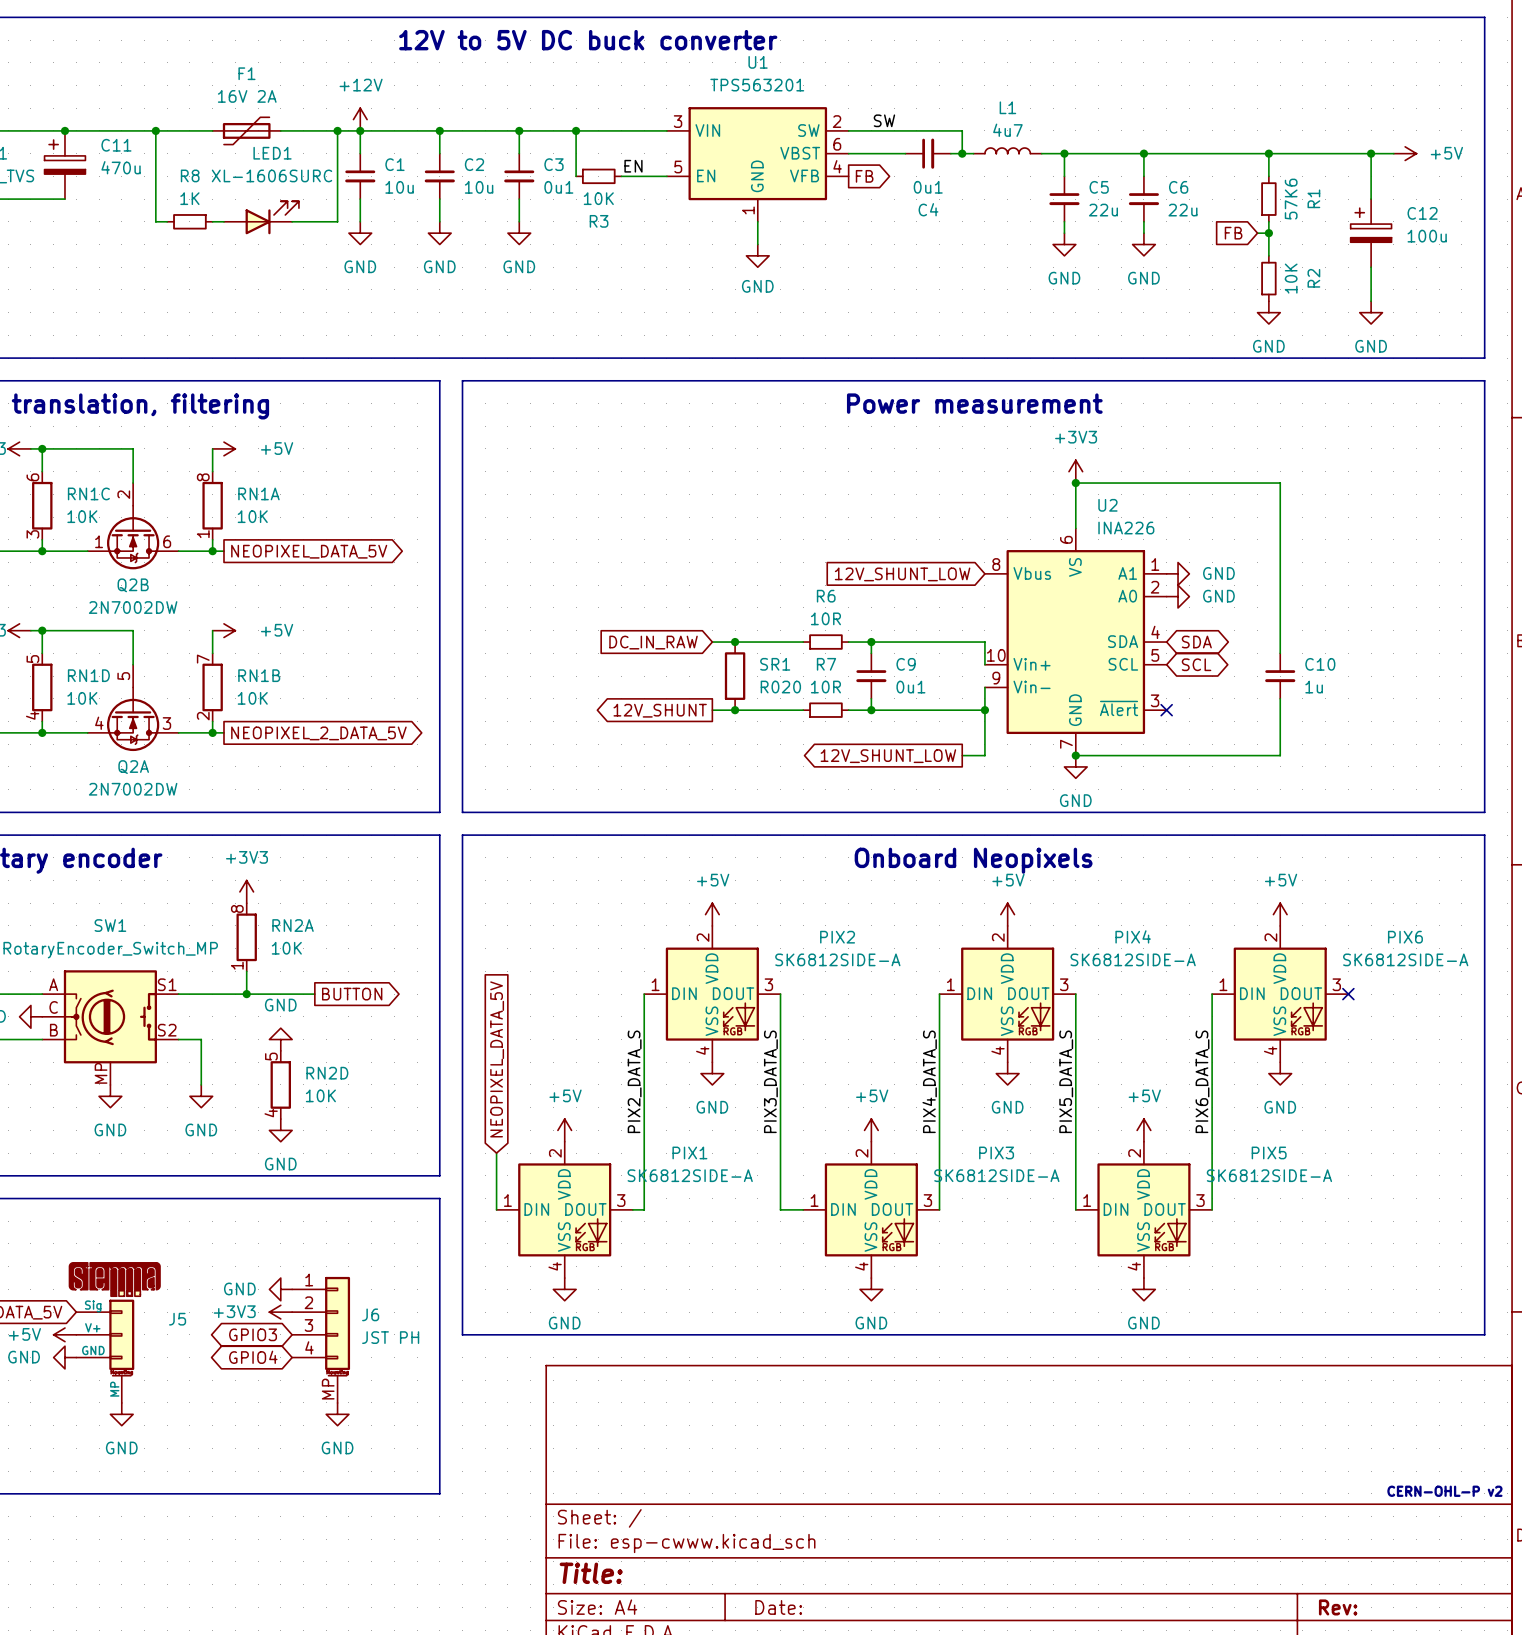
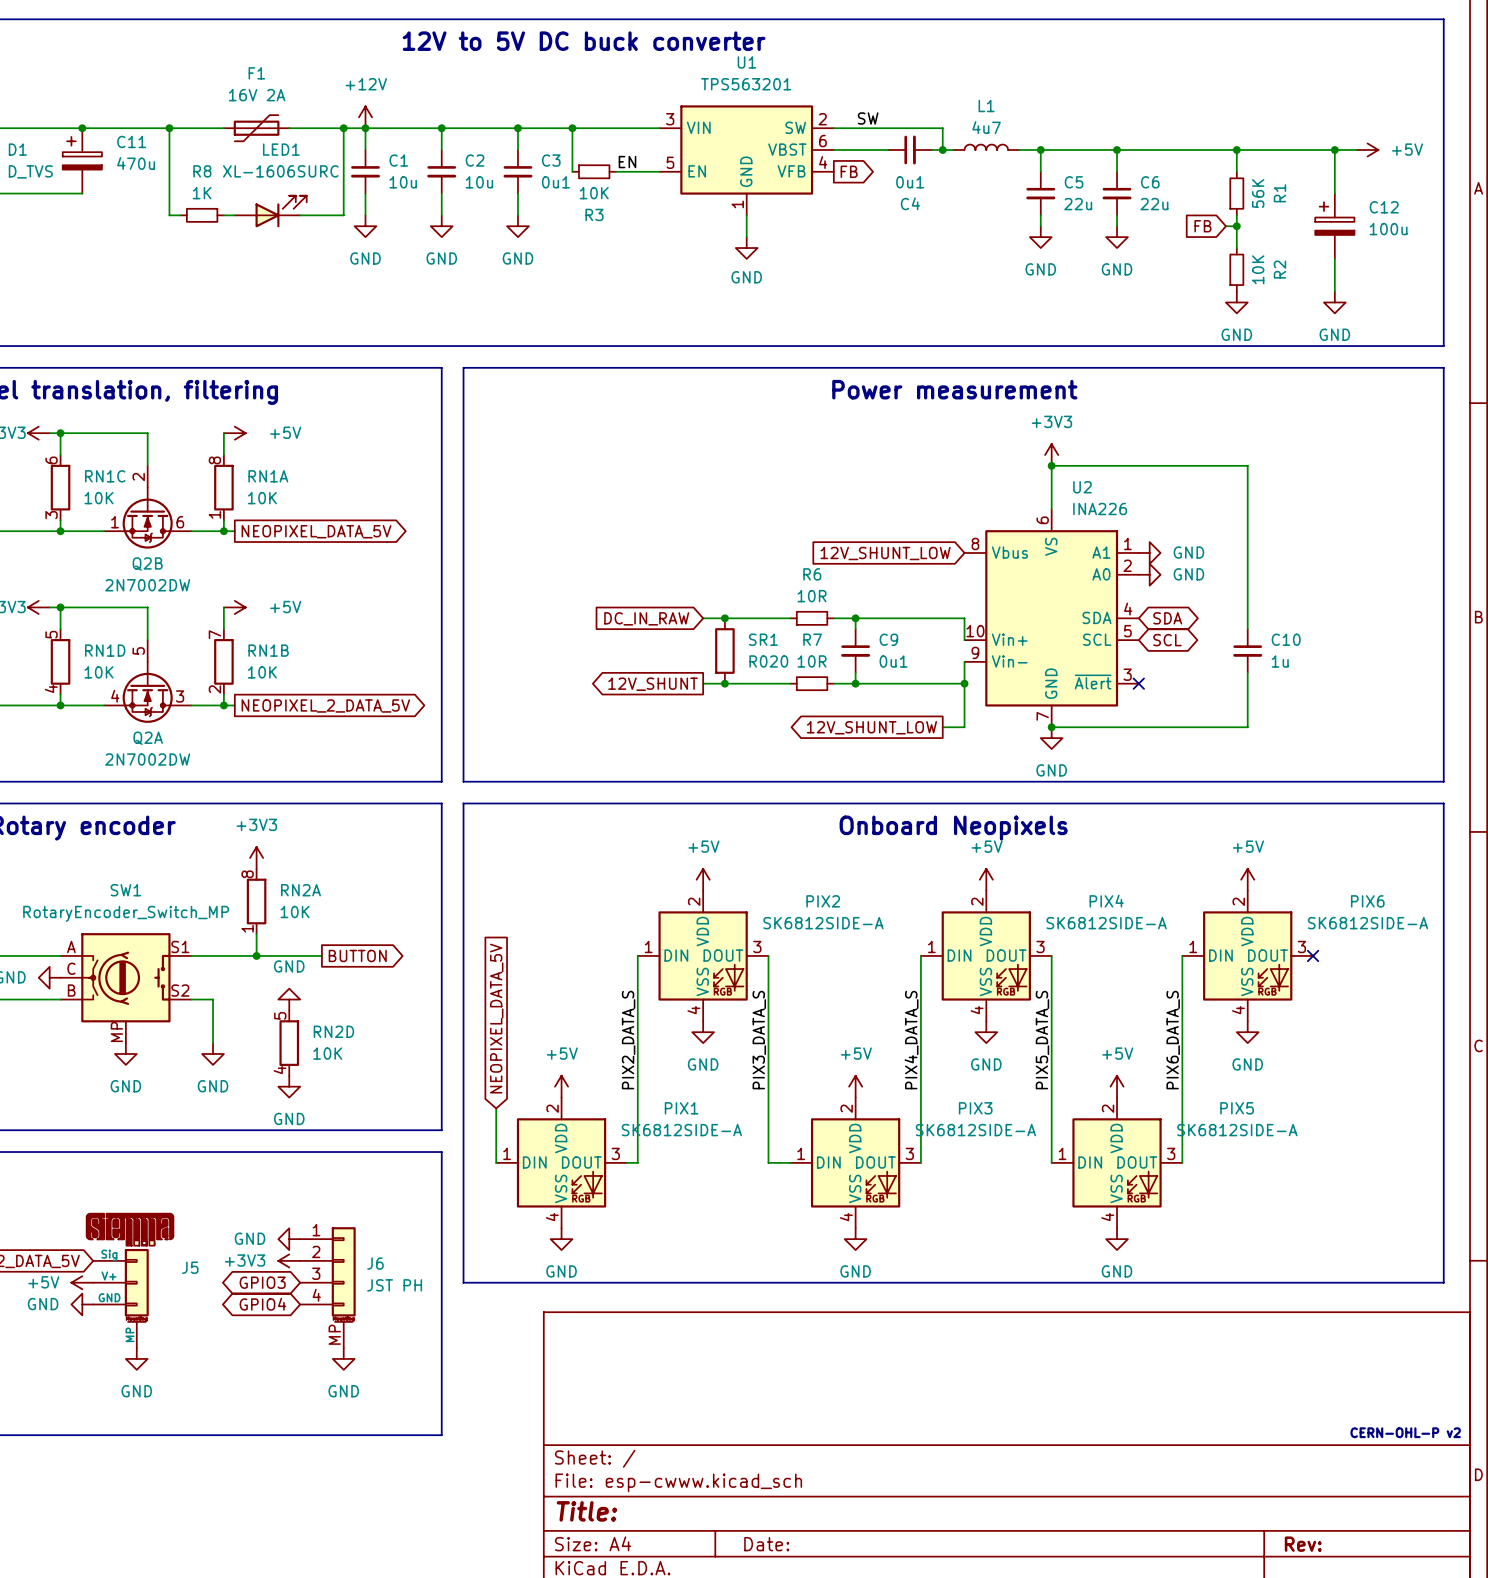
R1 value: 57K6 (1291, 199) -> 56K (1258, 193)

